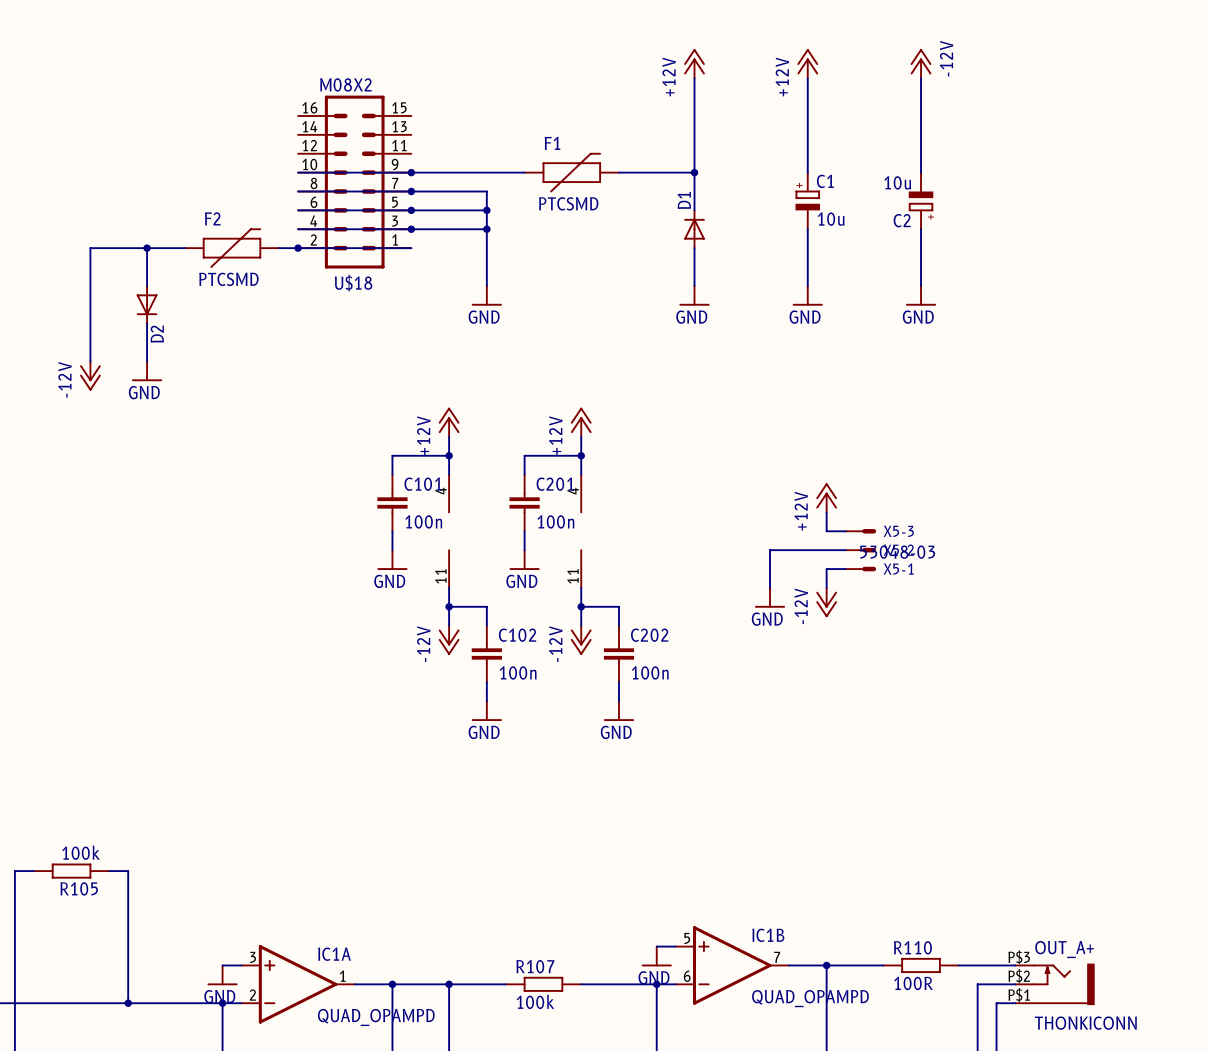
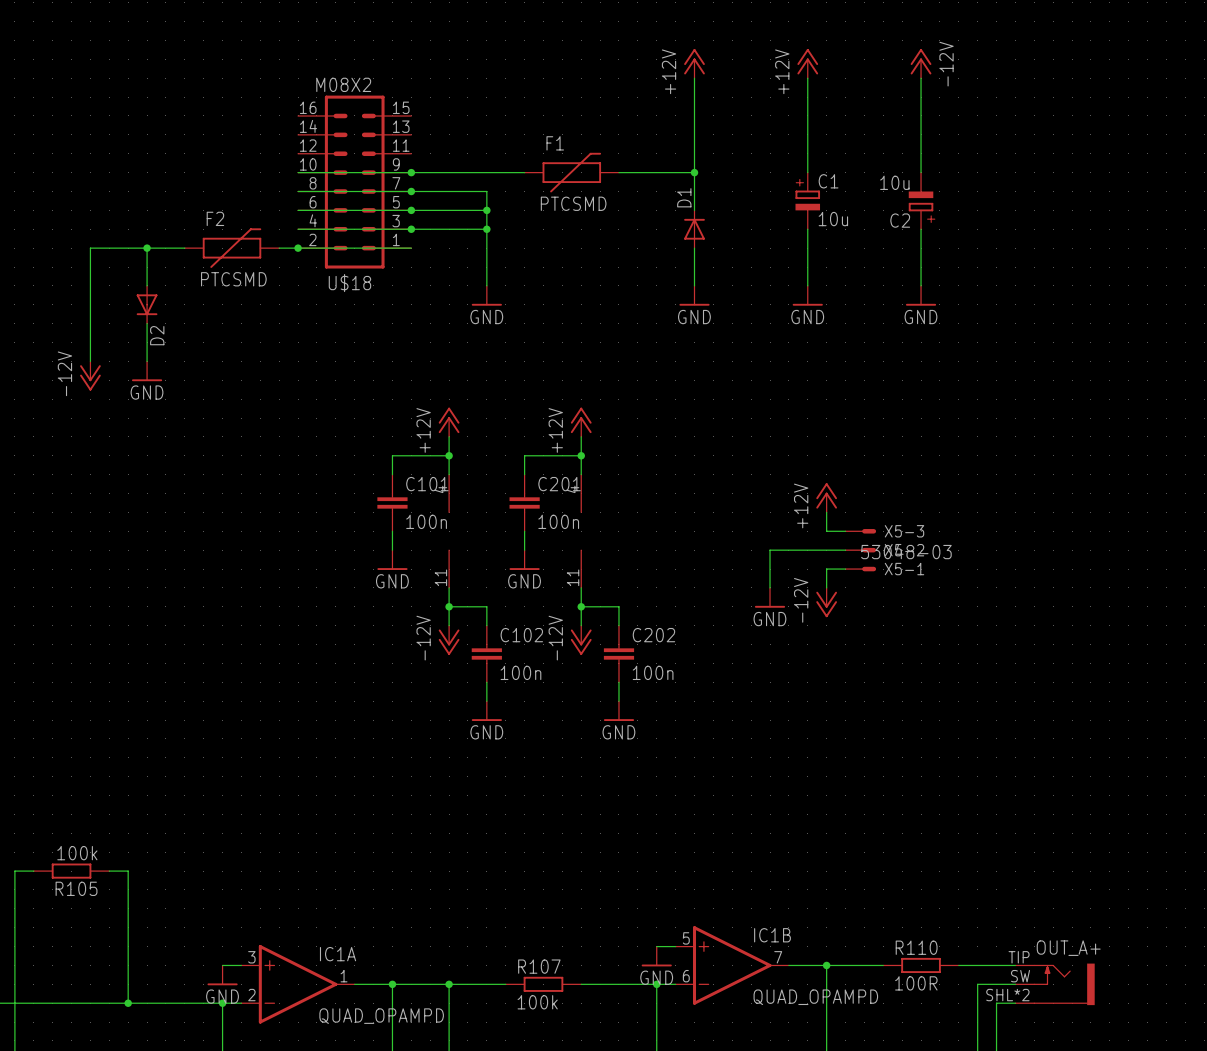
OUT_A+ pin number: P$3 (1019, 957) -> TIP (1019, 957)
OUT_A+ pin number: P$2 (1019, 976) -> SW (1020, 976)
OUT_A+ pin number: P$1 (1019, 995) -> SHL*2 (1007, 995)
OUT_A+ value: THONKICONN (1085, 1023) -> none

